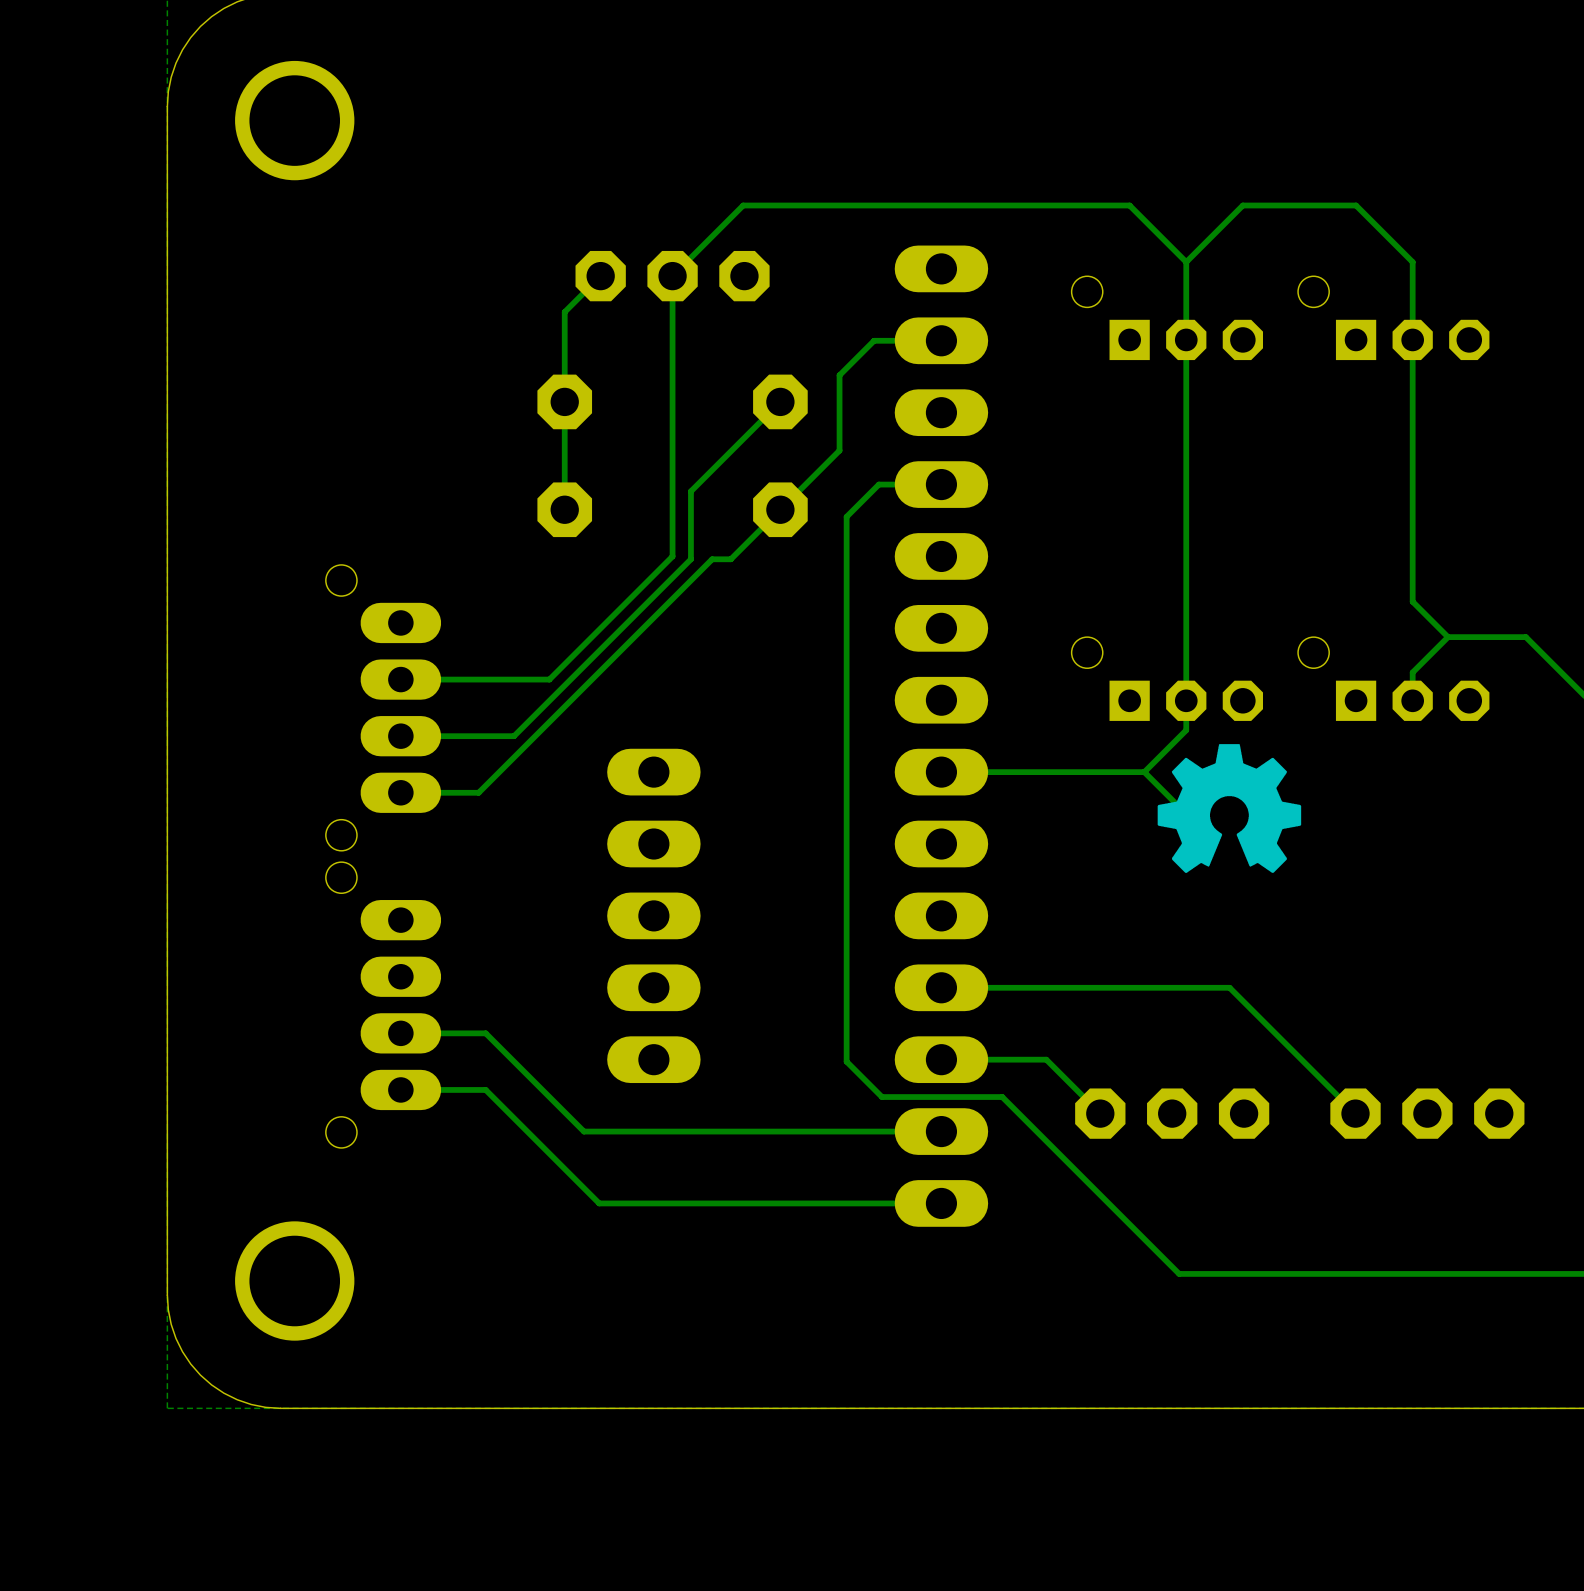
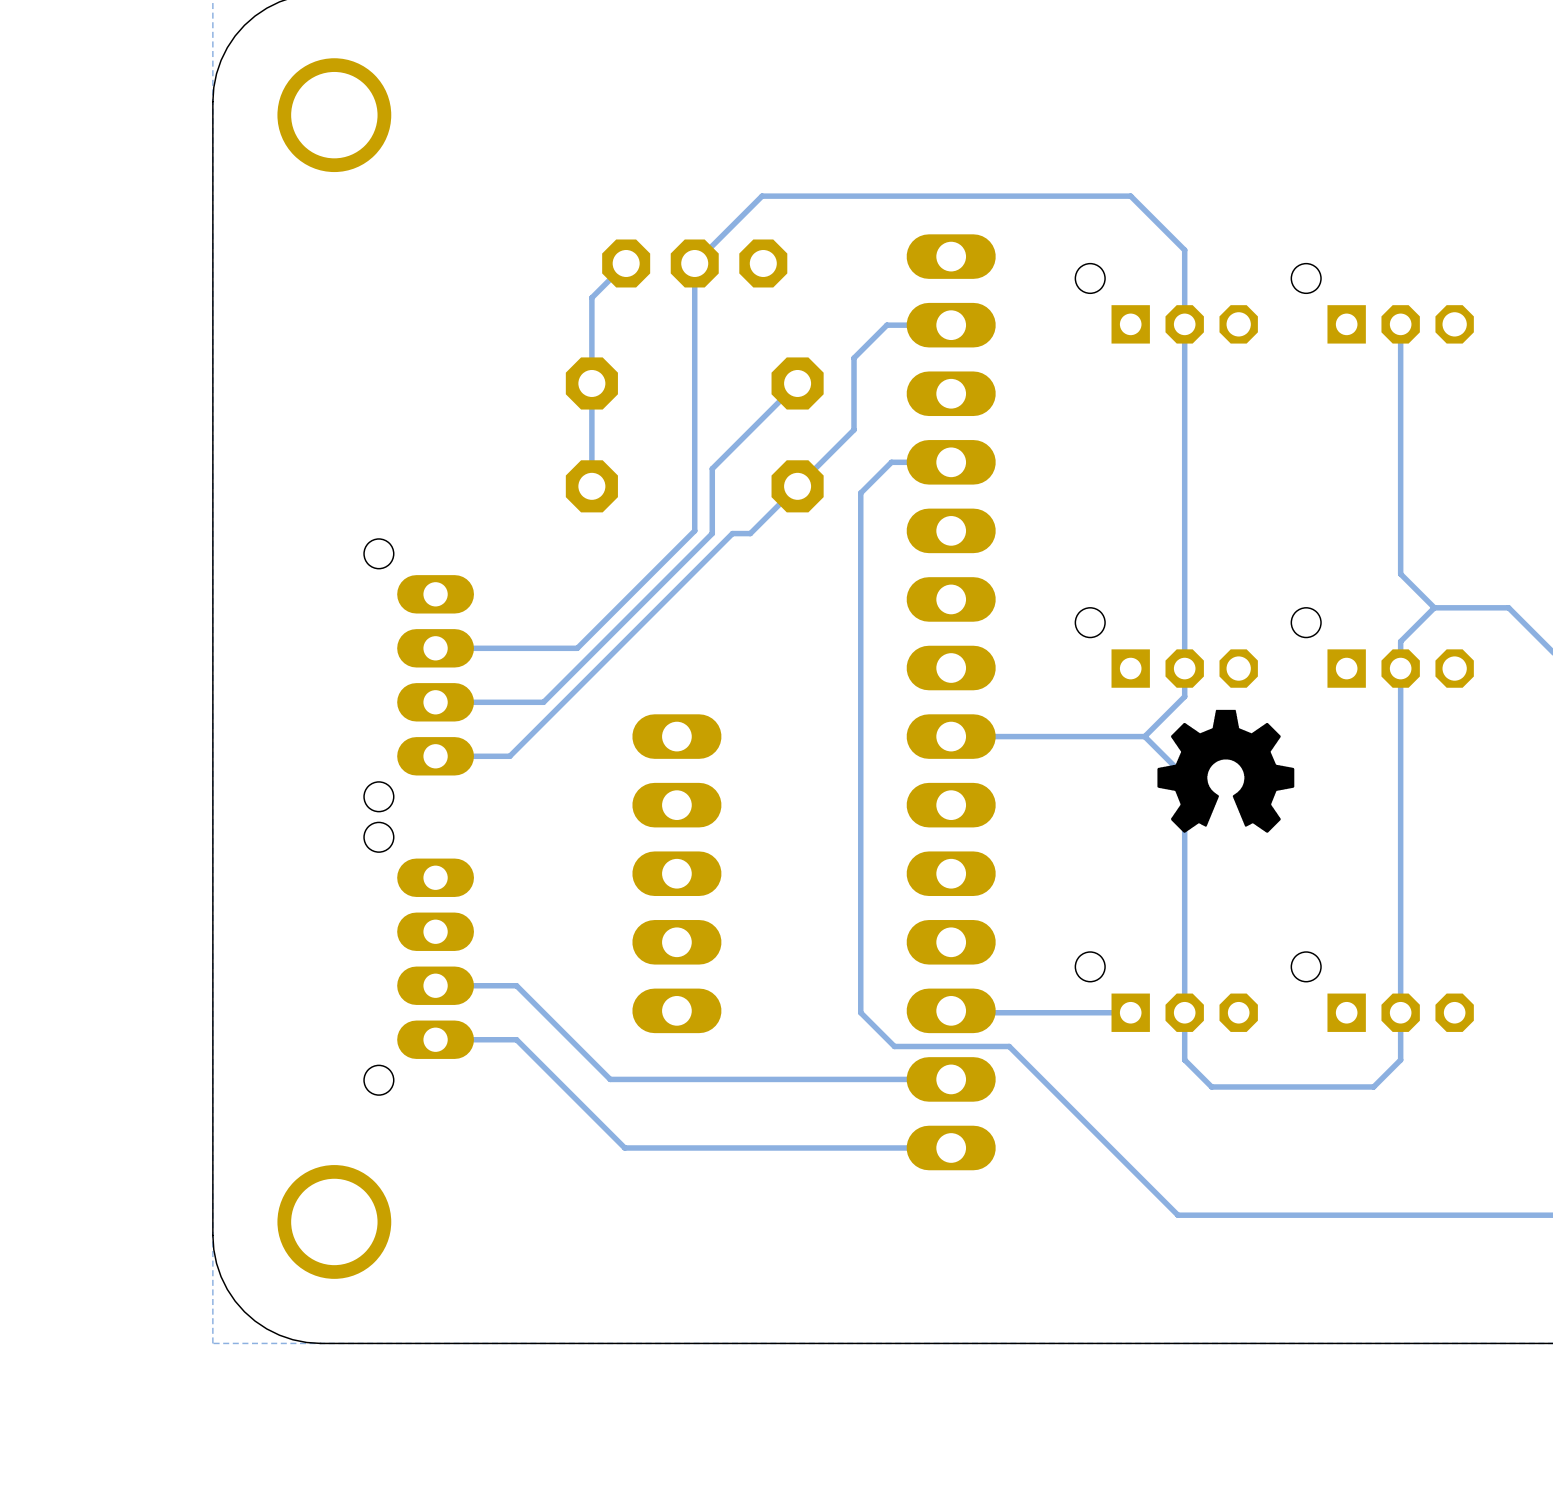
track: (1186, 262) (1242, 205) (1356, 205) (1412, 262) (1412, 339) -> none
track: none -> (1400, 668) (1400, 1059) (1373, 1086) (1211, 1086) (1184, 1059) (1184, 776)
track: (941, 987) (1229, 987) (1355, 1113) -> none
part: none -> (1166, 991)
part: none -> (1382, 991)
track: (941, 1059) (1046, 1059) (1100, 1113) -> (951, 1010) (953, 1012) (1130, 1012)
part: (1172, 1113) -> none
part: (1427, 1113) -> none

